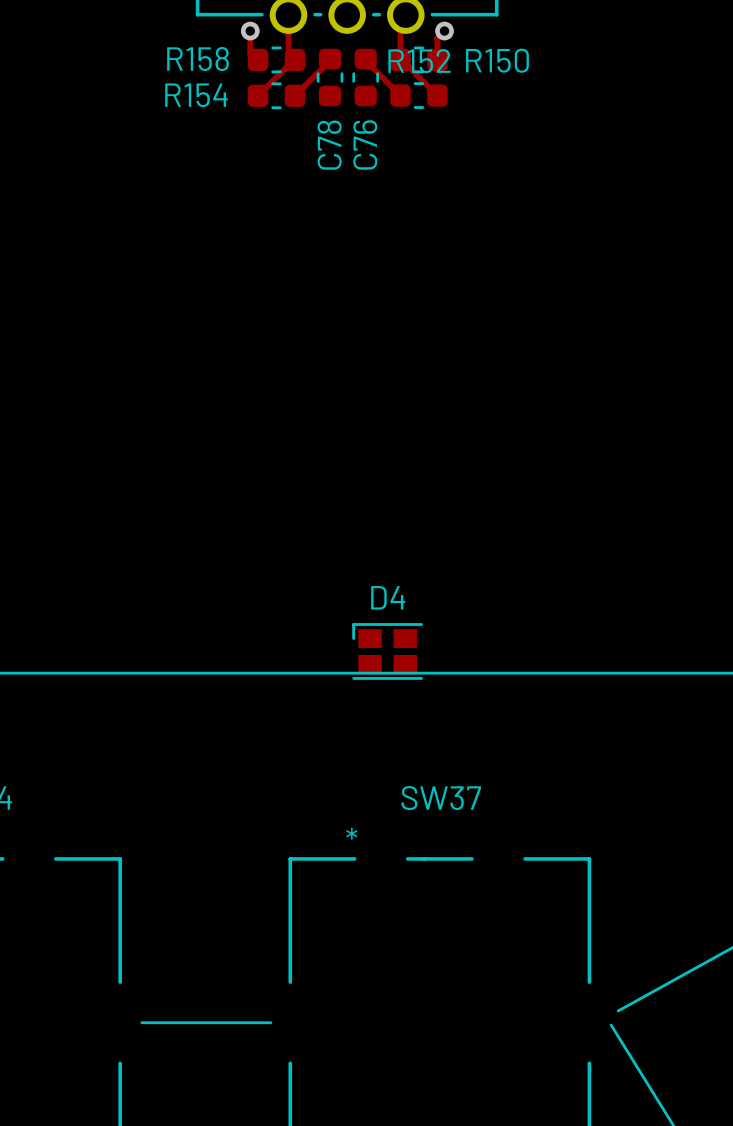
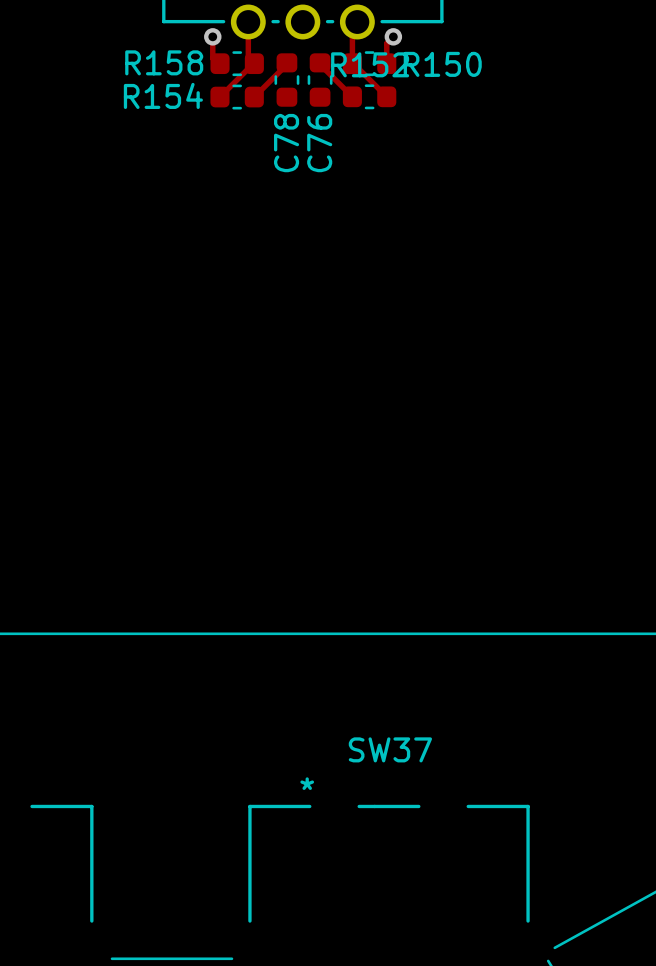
D4: (387, 651) -> none

